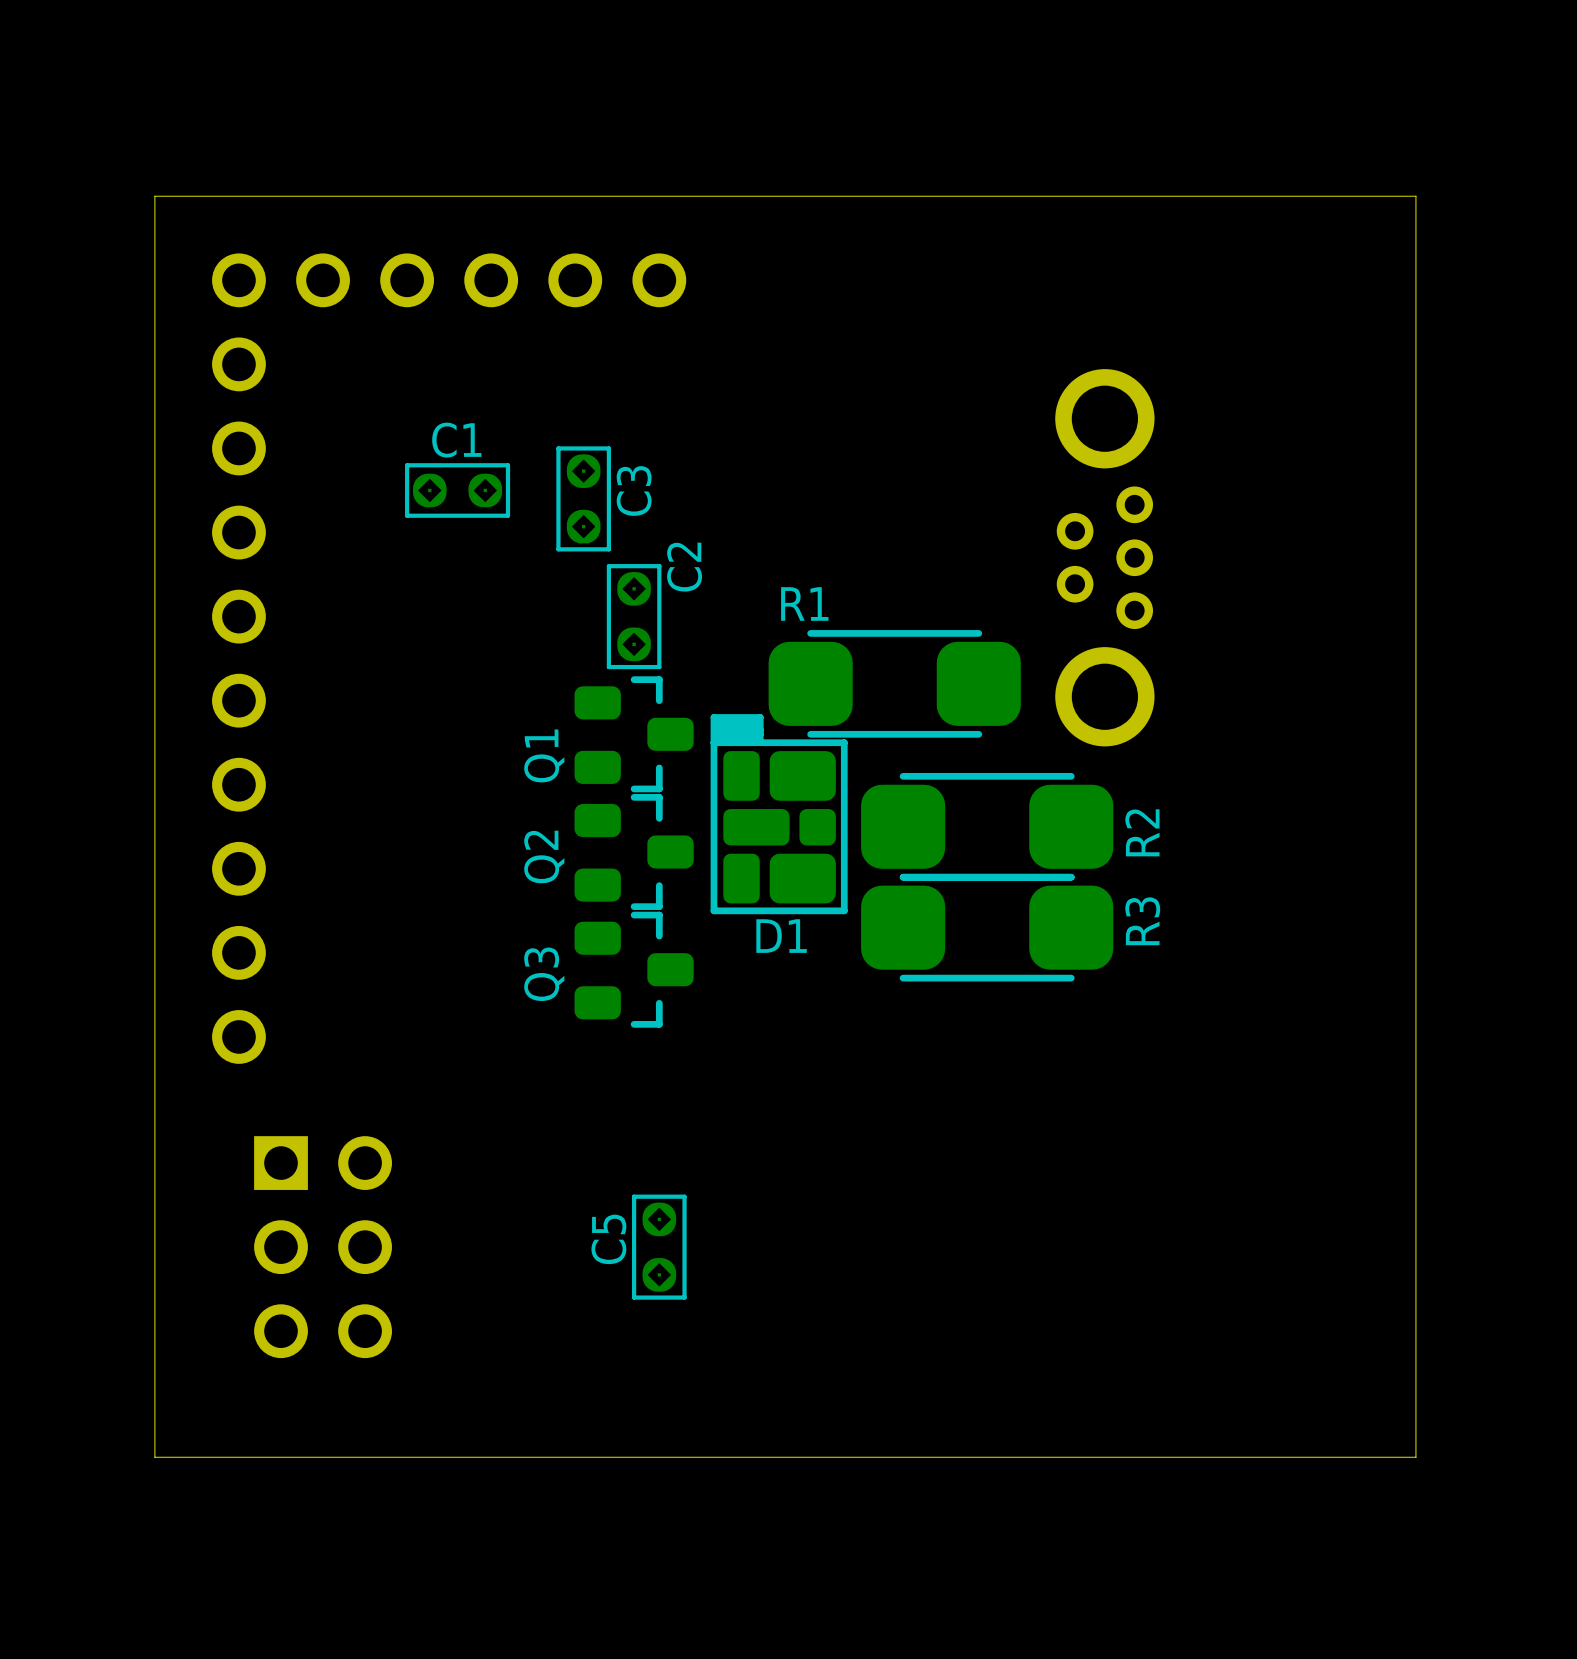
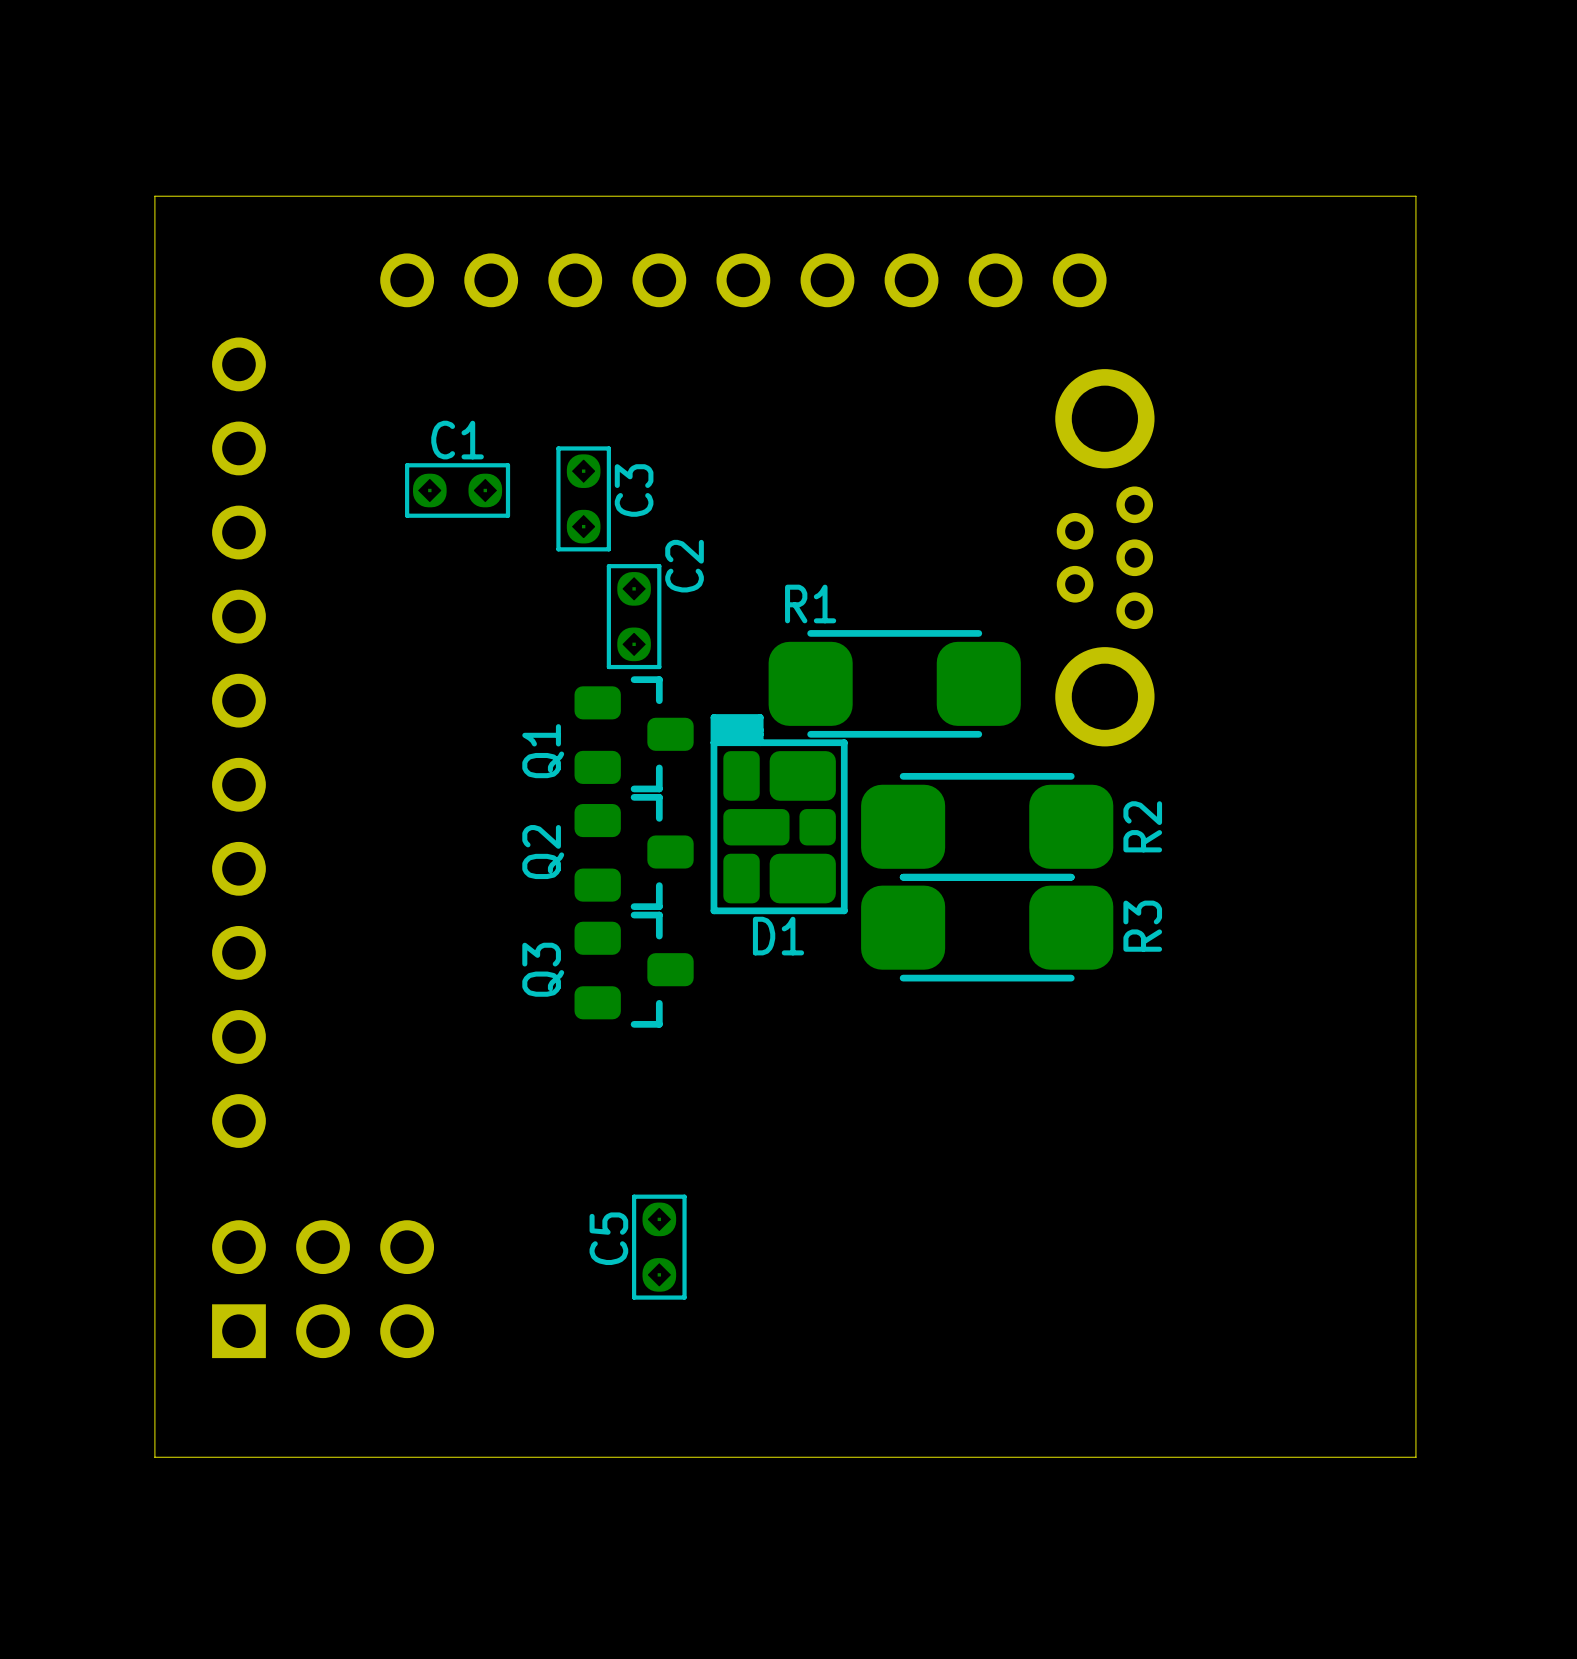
part: (238, 280) -> none
part: (323, 280) -> none
part: none -> (743, 280)
part: none -> (827, 280)
part: none -> (911, 280)
part: none -> (995, 280)
part: none -> (1079, 280)
part: none -> (238, 1121)
part rotation: 0° (323, 1247) -> 90° counterclockwise (323, 1289)

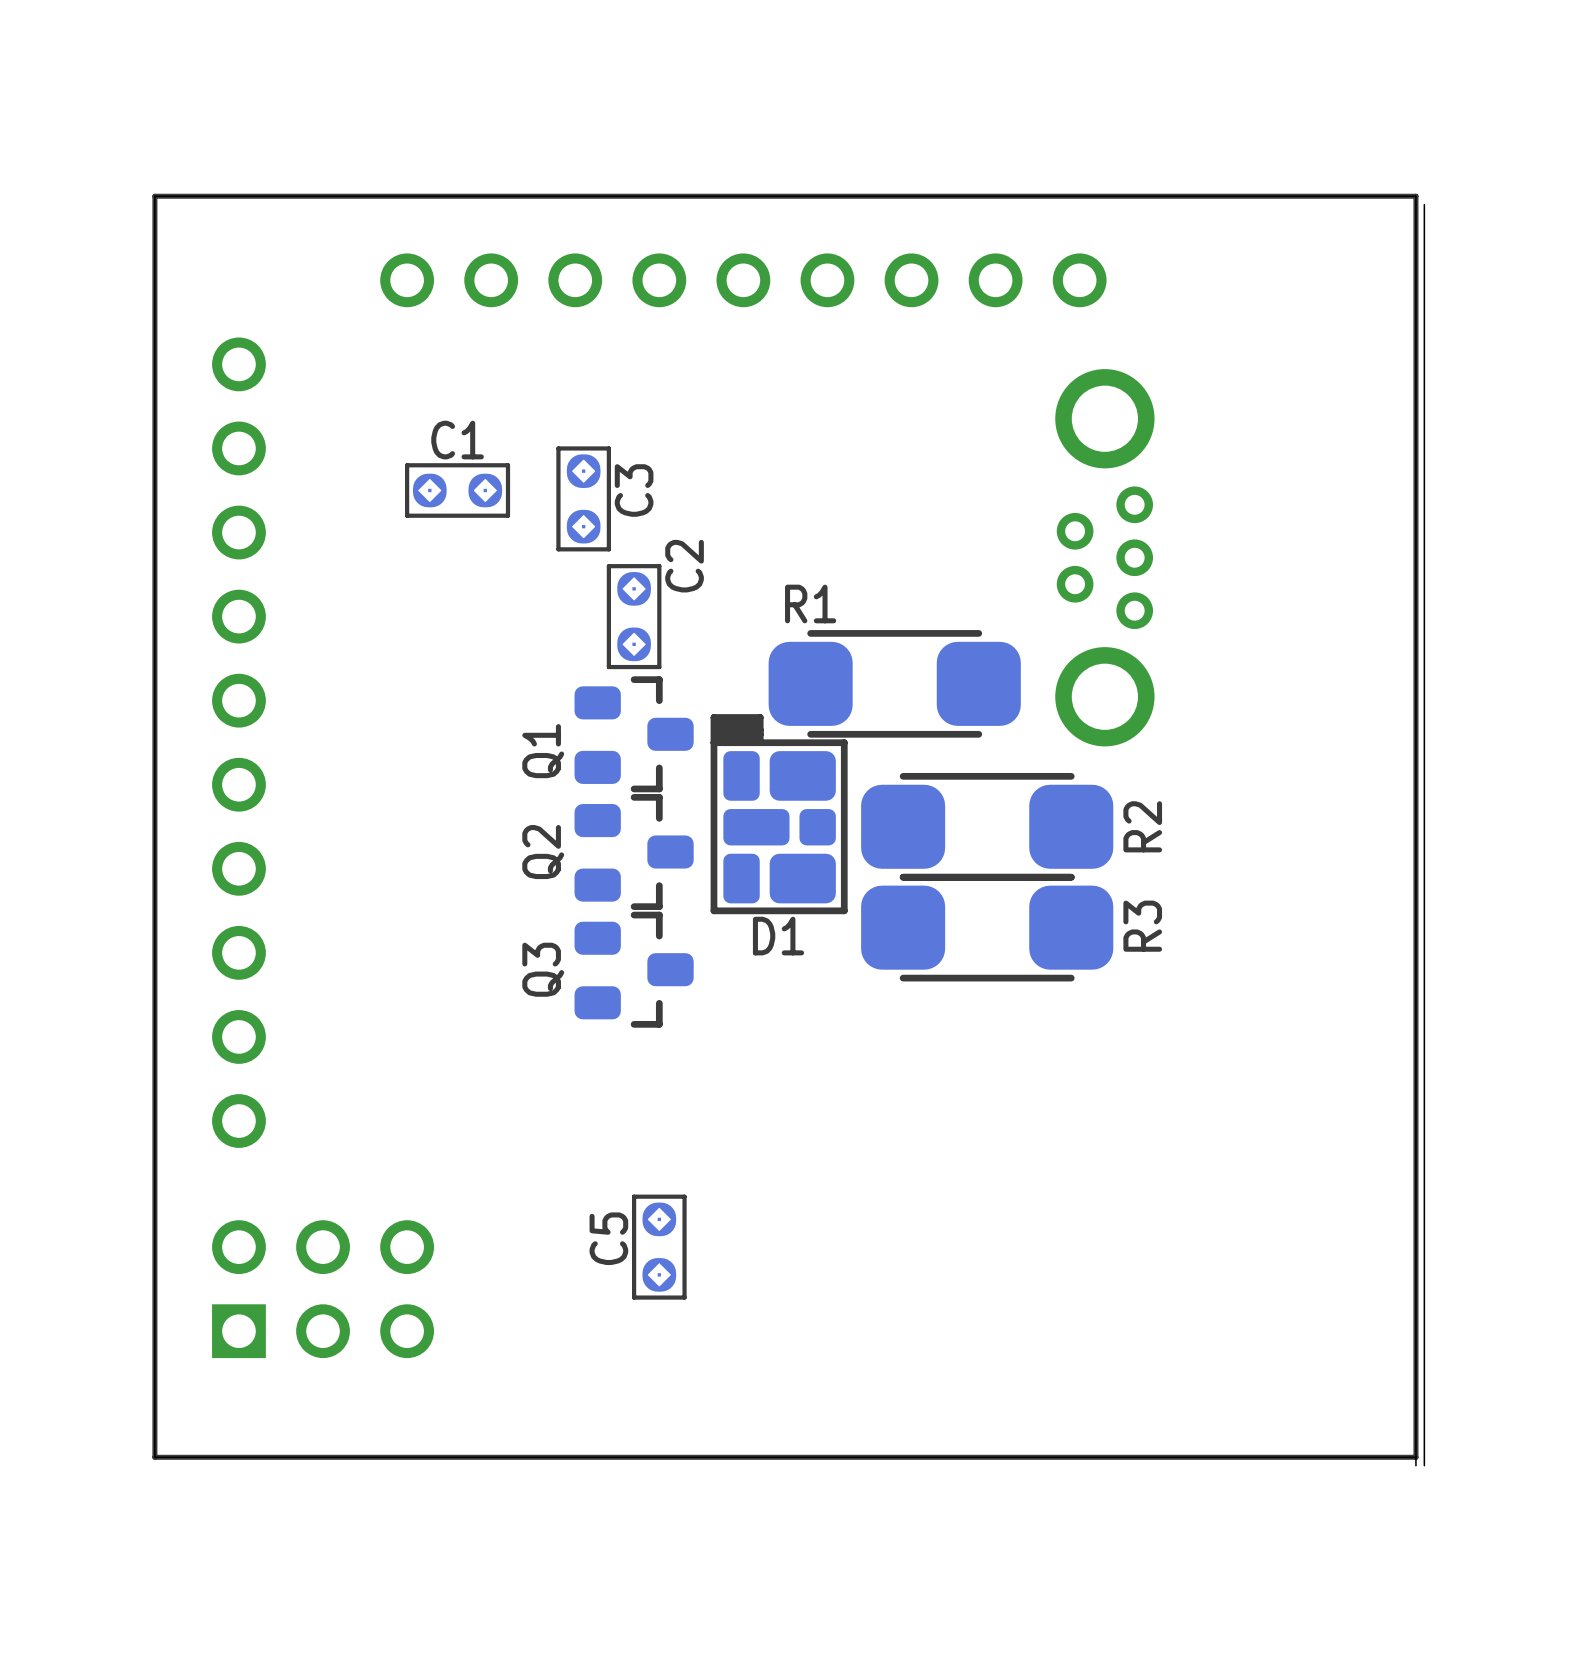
line: none -> (1415, 196) (154, 196) (154, 1457) (1415, 1457) (1415, 196)
board edge: none -> (1424, 204) (1424, 1465)
board edge: none -> (1415, 1457) (1415, 1465)

